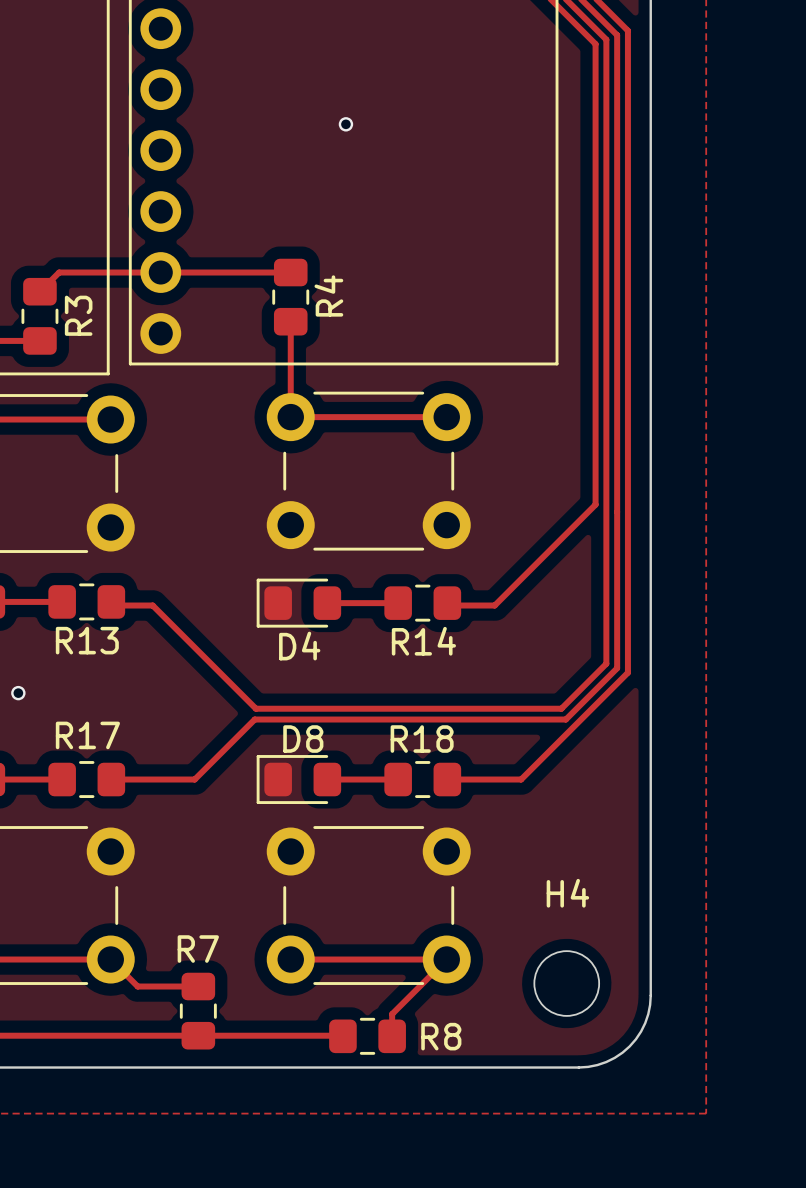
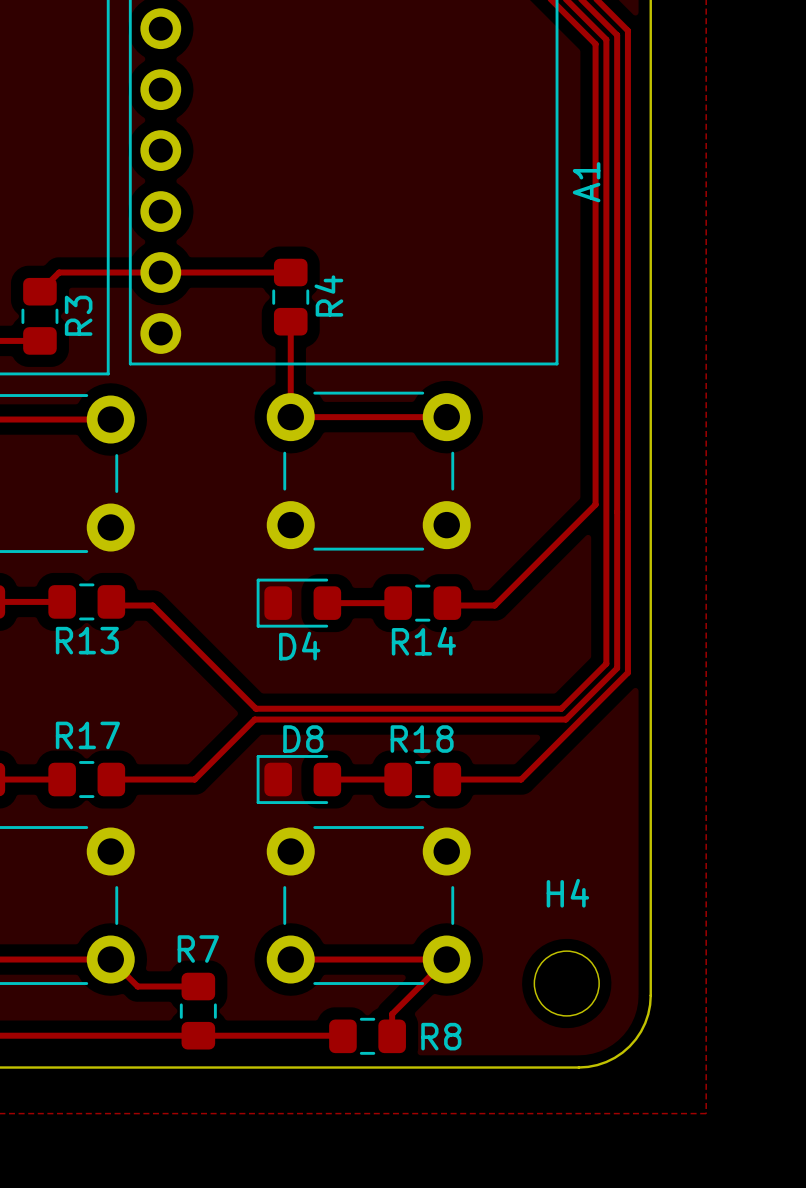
via: (345, 124) -> none
A1 name: none -> A1 (586, 182)
via: (18, 693) -> none

